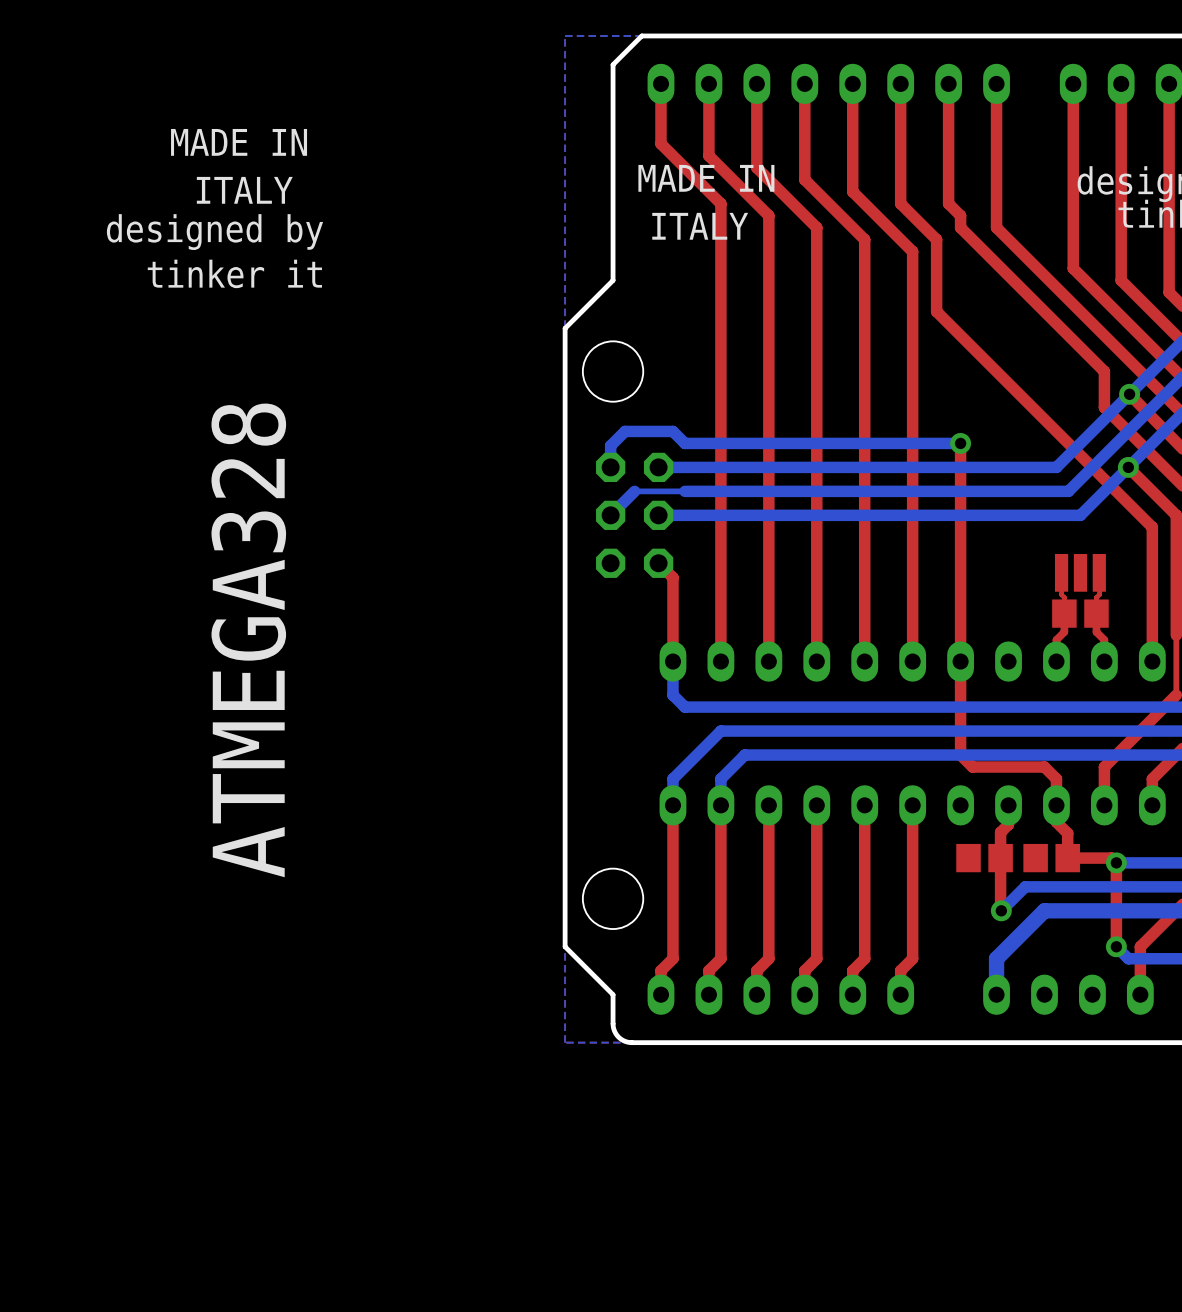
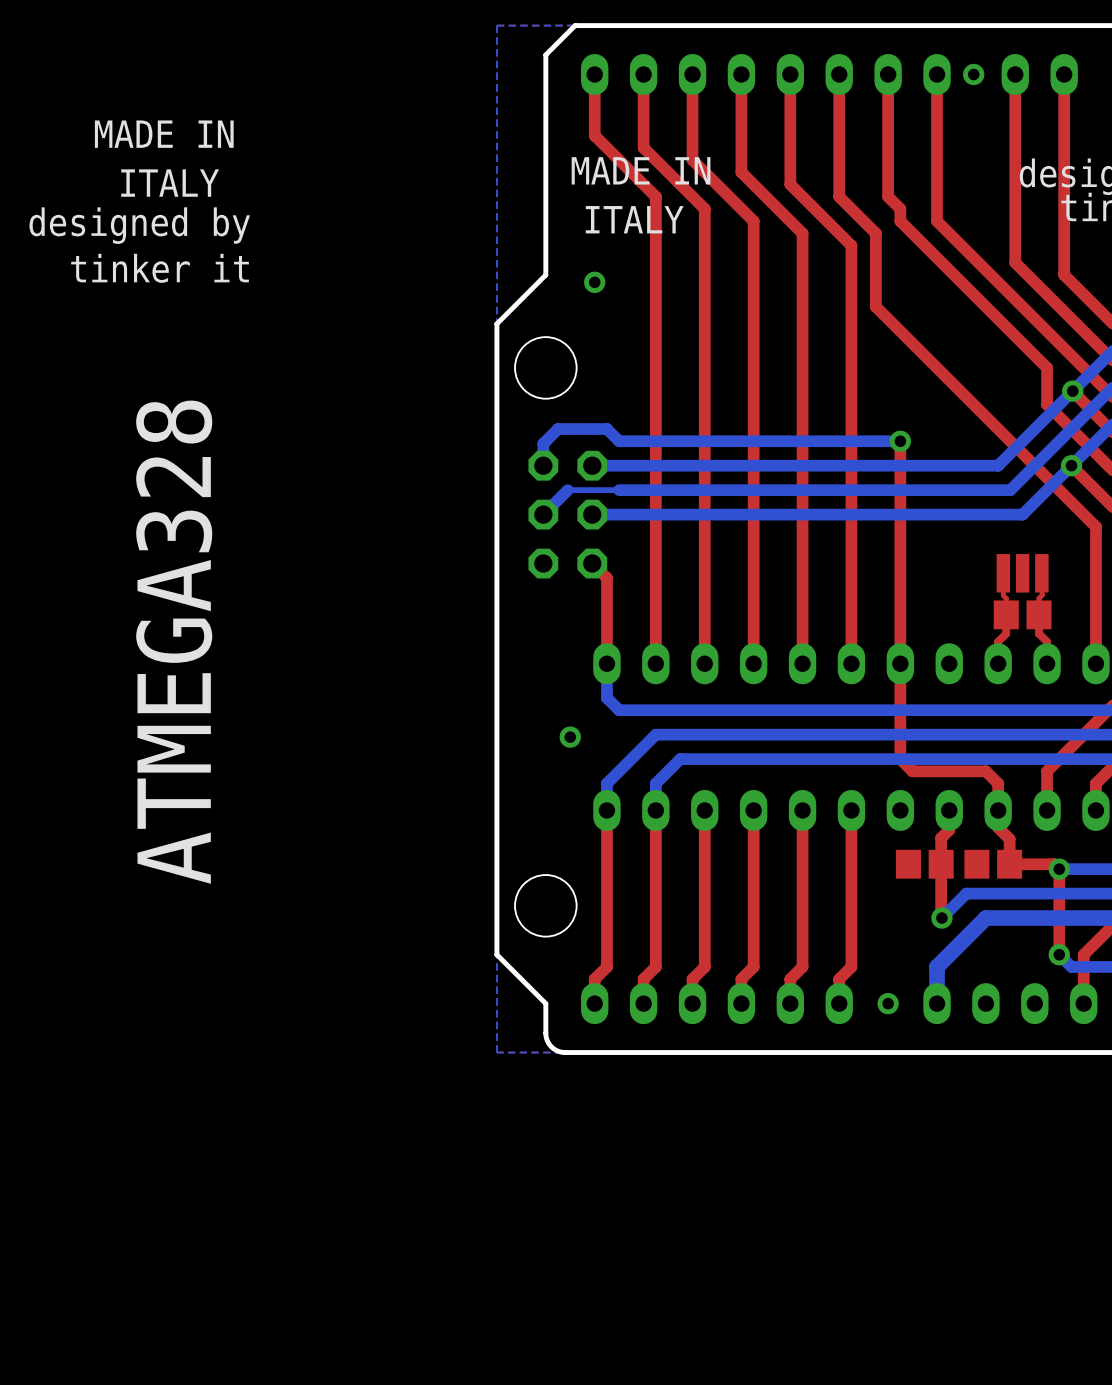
via: none -> (973, 74)
via: none -> (594, 282)
via: none -> (570, 737)
via: none -> (888, 1003)

